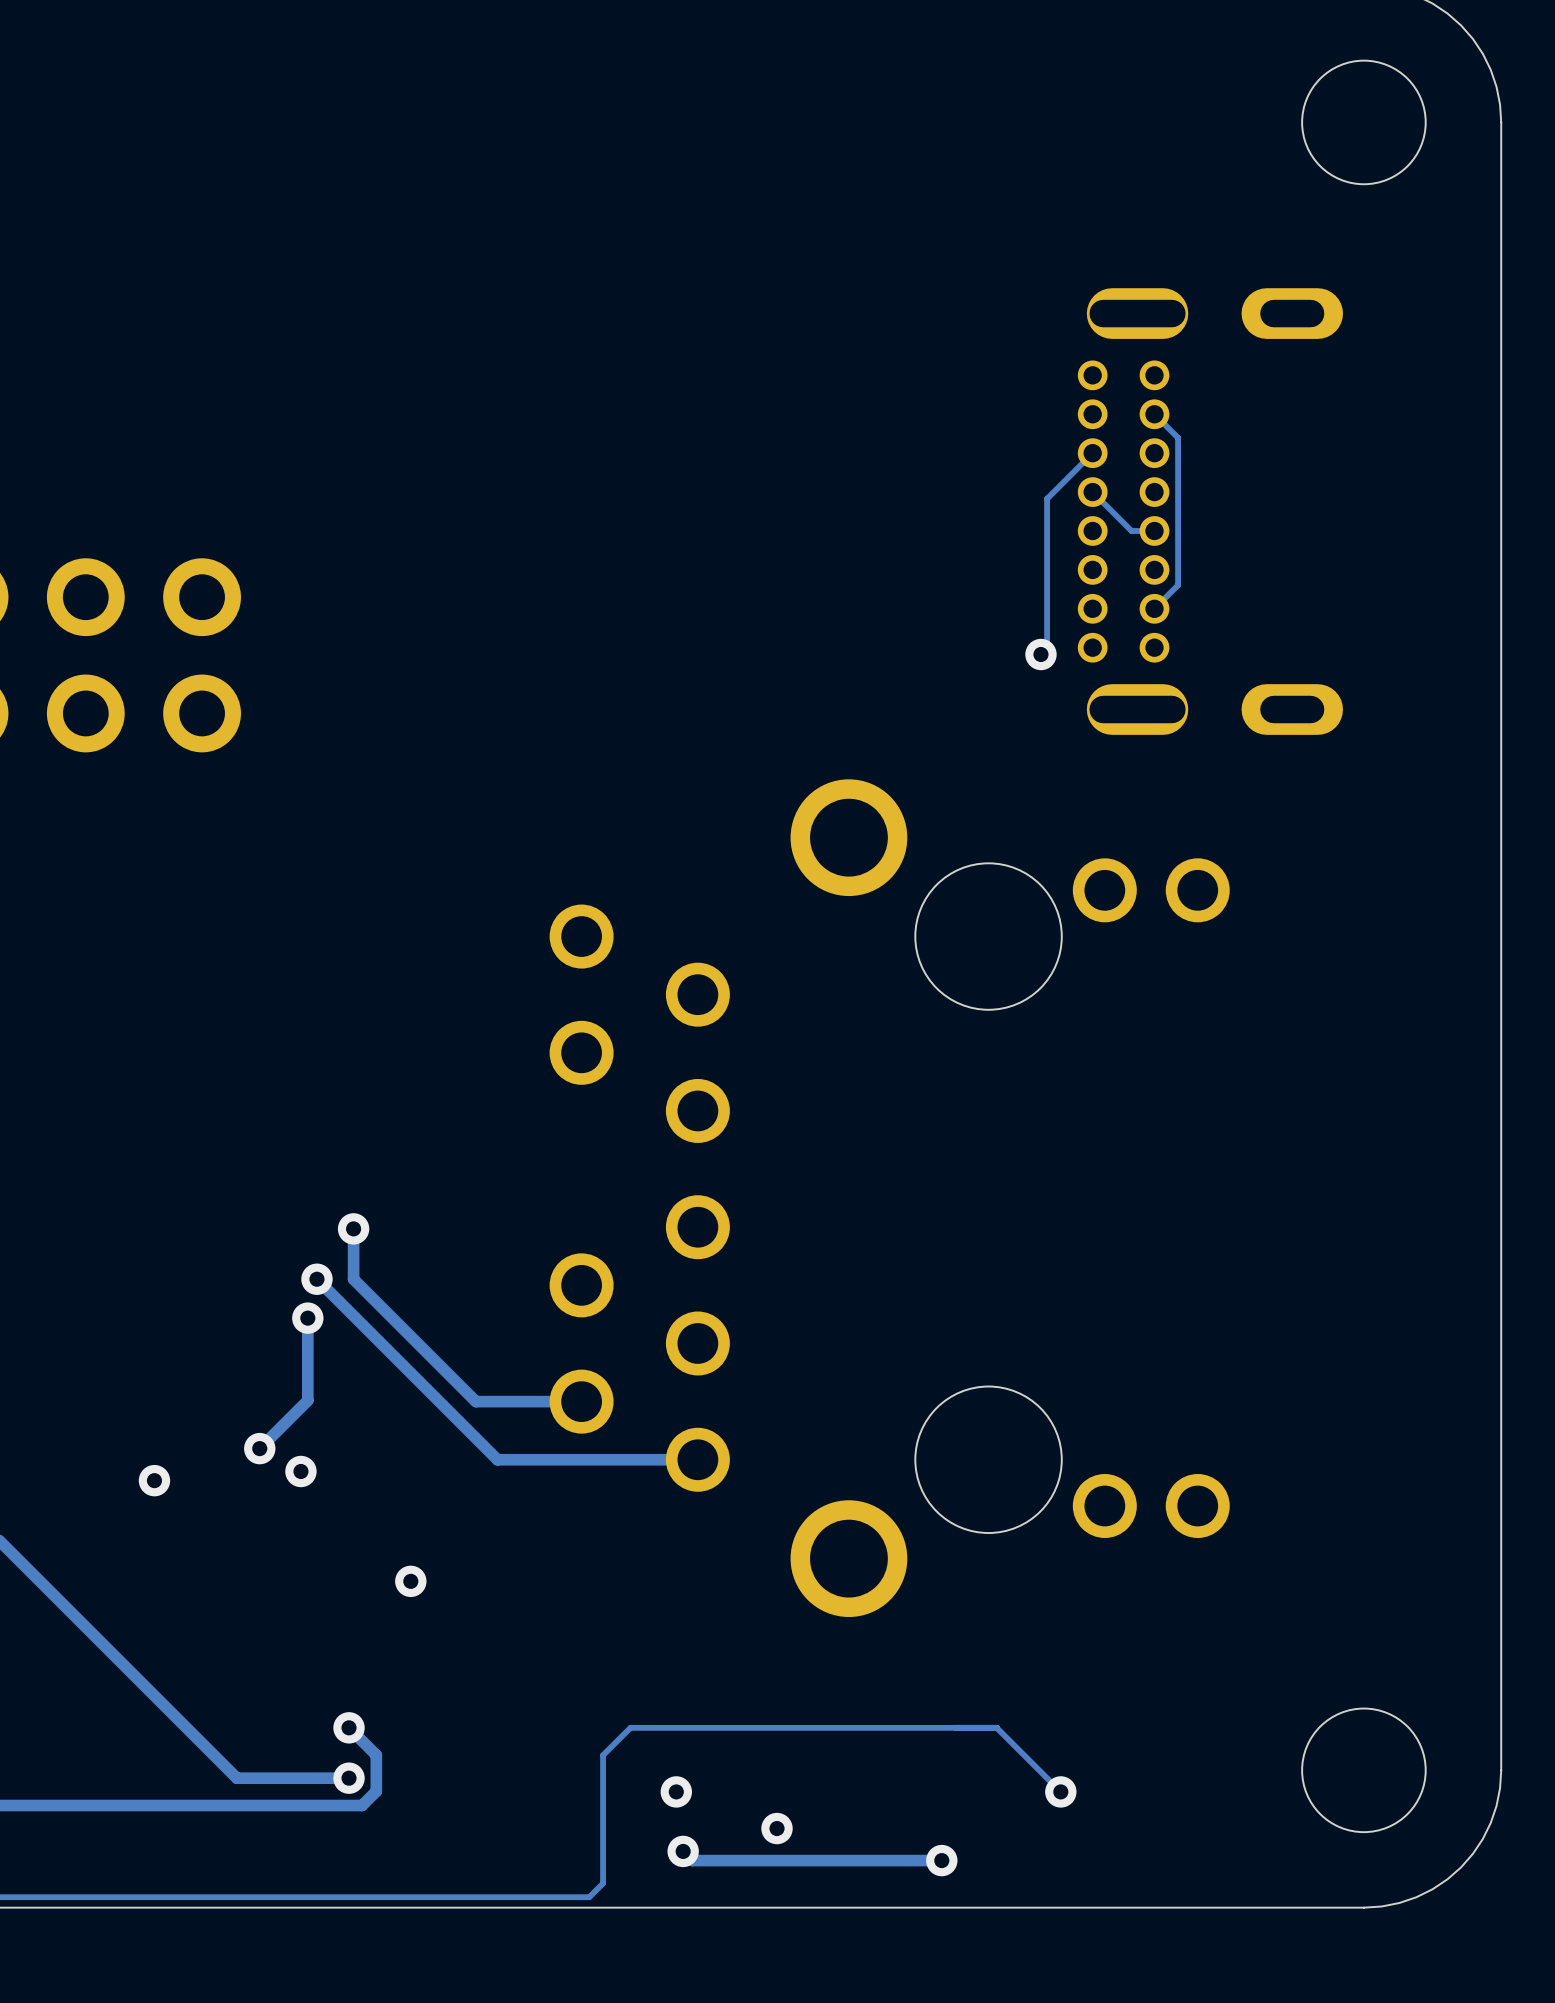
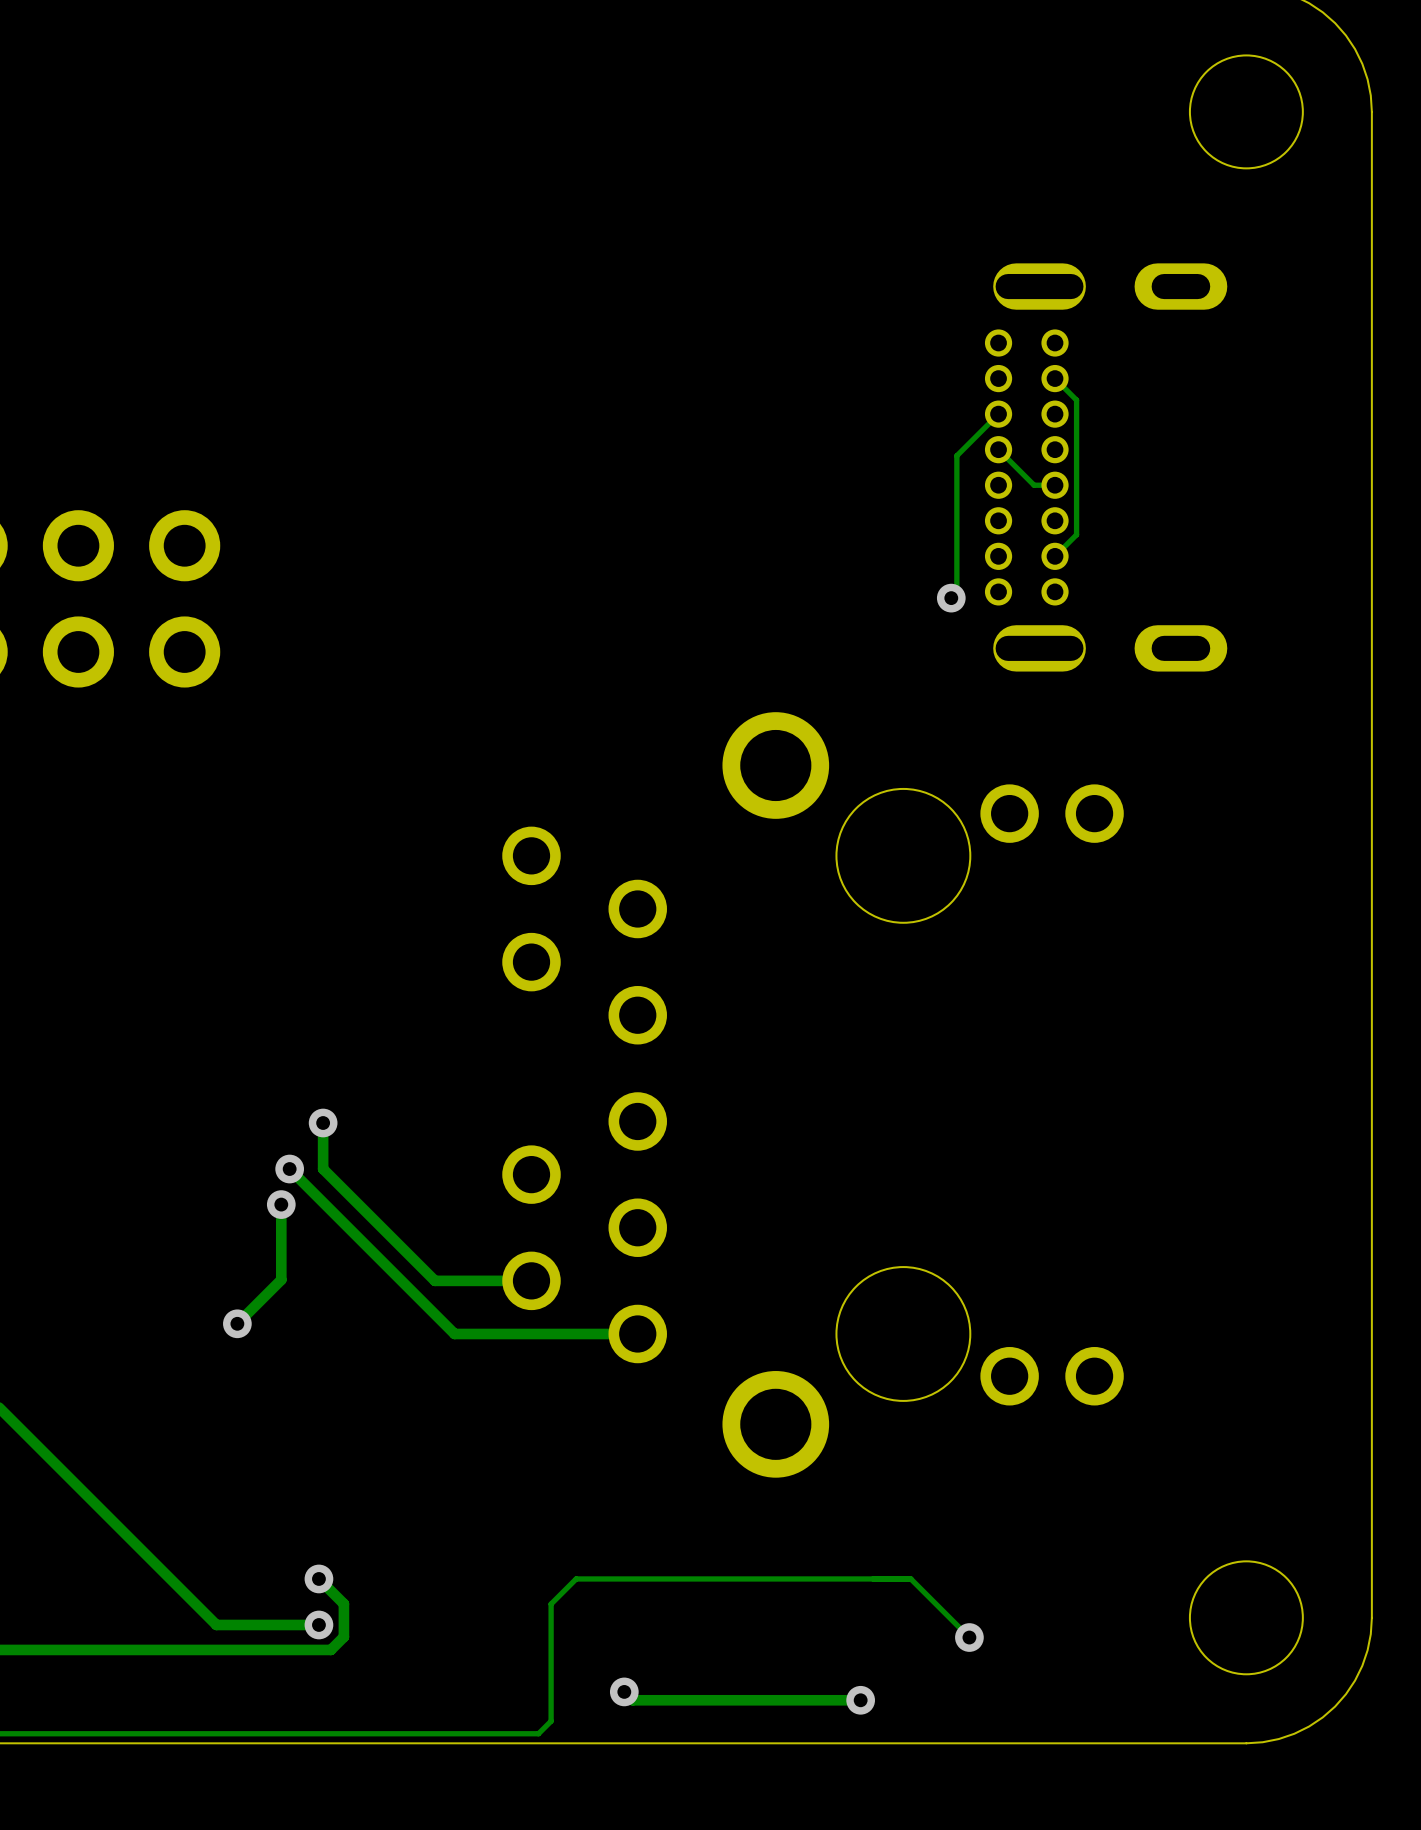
via: (300, 1471) -> none
via: (154, 1480) -> none
via: (410, 1581) -> none
via: (676, 1791) -> none
via: (777, 1828) -> none

